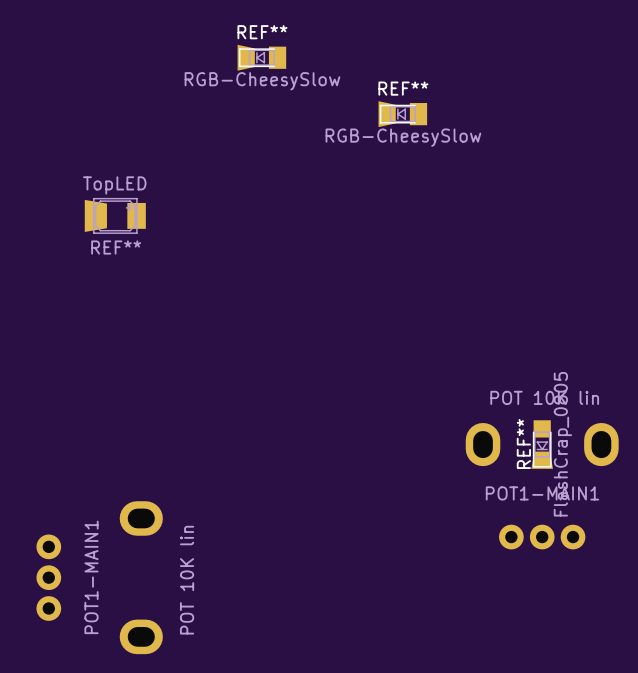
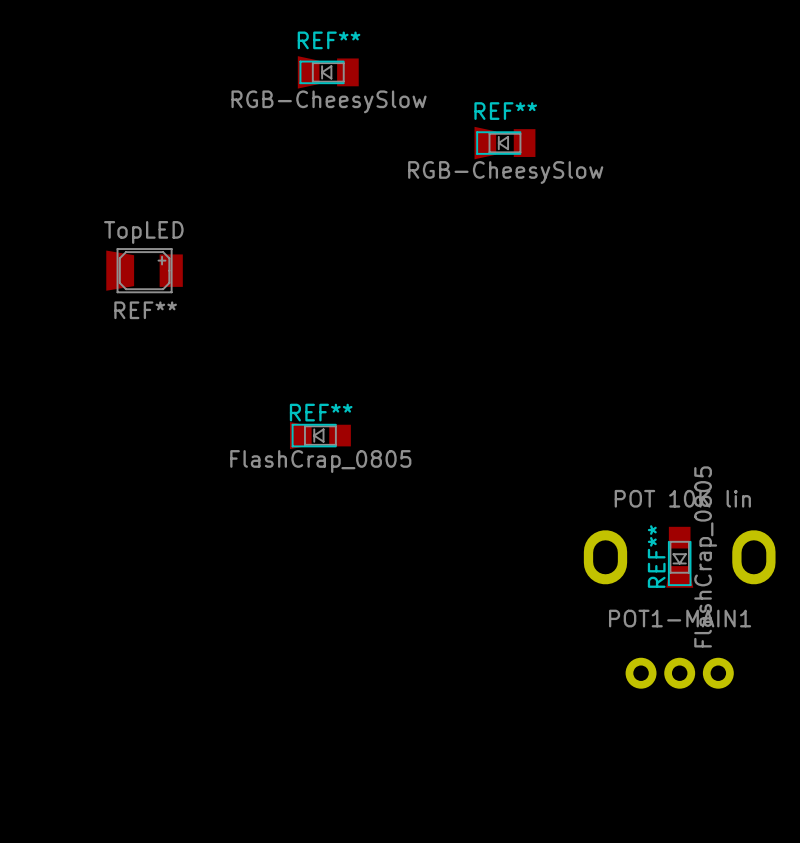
REF**: none -> FlashCrap_0805 (320, 435)
POT1-MAIN1: POT 10K lin (99, 577) -> none

